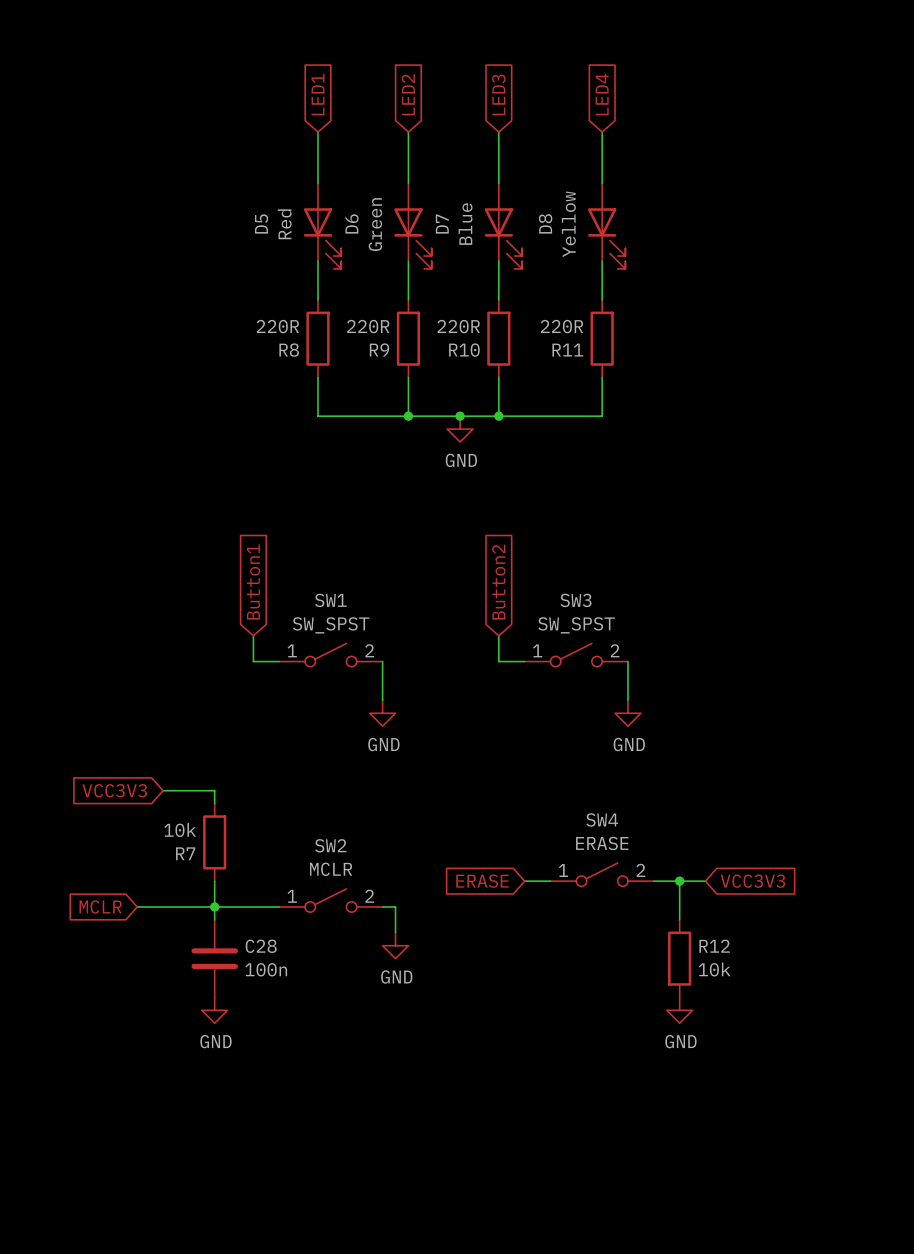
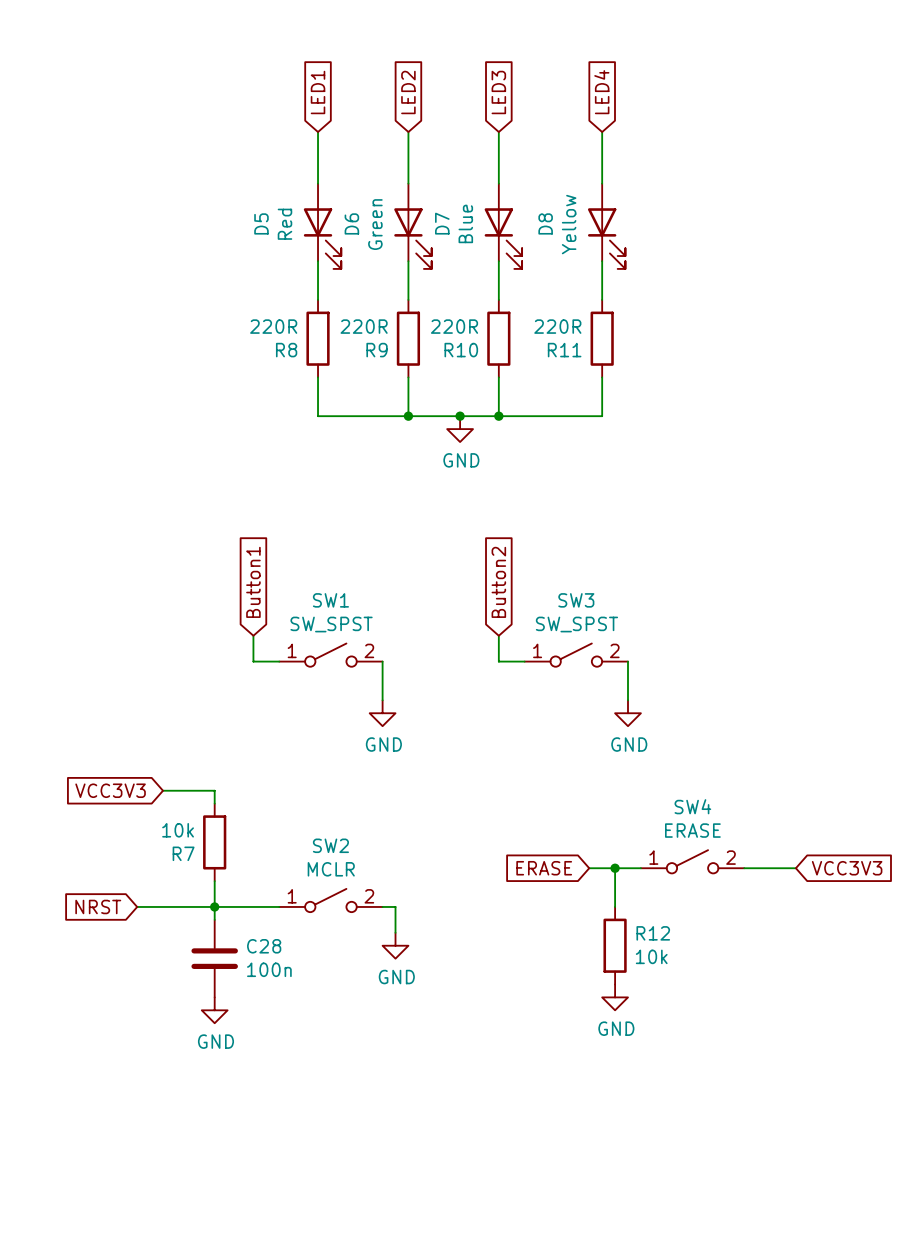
junction: none -> (615, 868)
SW4 position: (602, 874) -> (692, 861)
global label position: ERASE (482, 881) -> ERASE (544, 868)
wire: (653, 881) (705, 881) -> (589, 868) (640, 868)
wire: (679, 881) (679, 919) -> (615, 868) (615, 906)
junction: (679, 881) -> none
global label position: VCC3V3 (752, 881) -> VCC3V3 (847, 868)
global label: MCLR (100, 906) -> NRST (98, 906)
R12 position: (679, 958) -> (615, 945)
power symbol position: GND (679, 1010) -> GND (615, 997)

